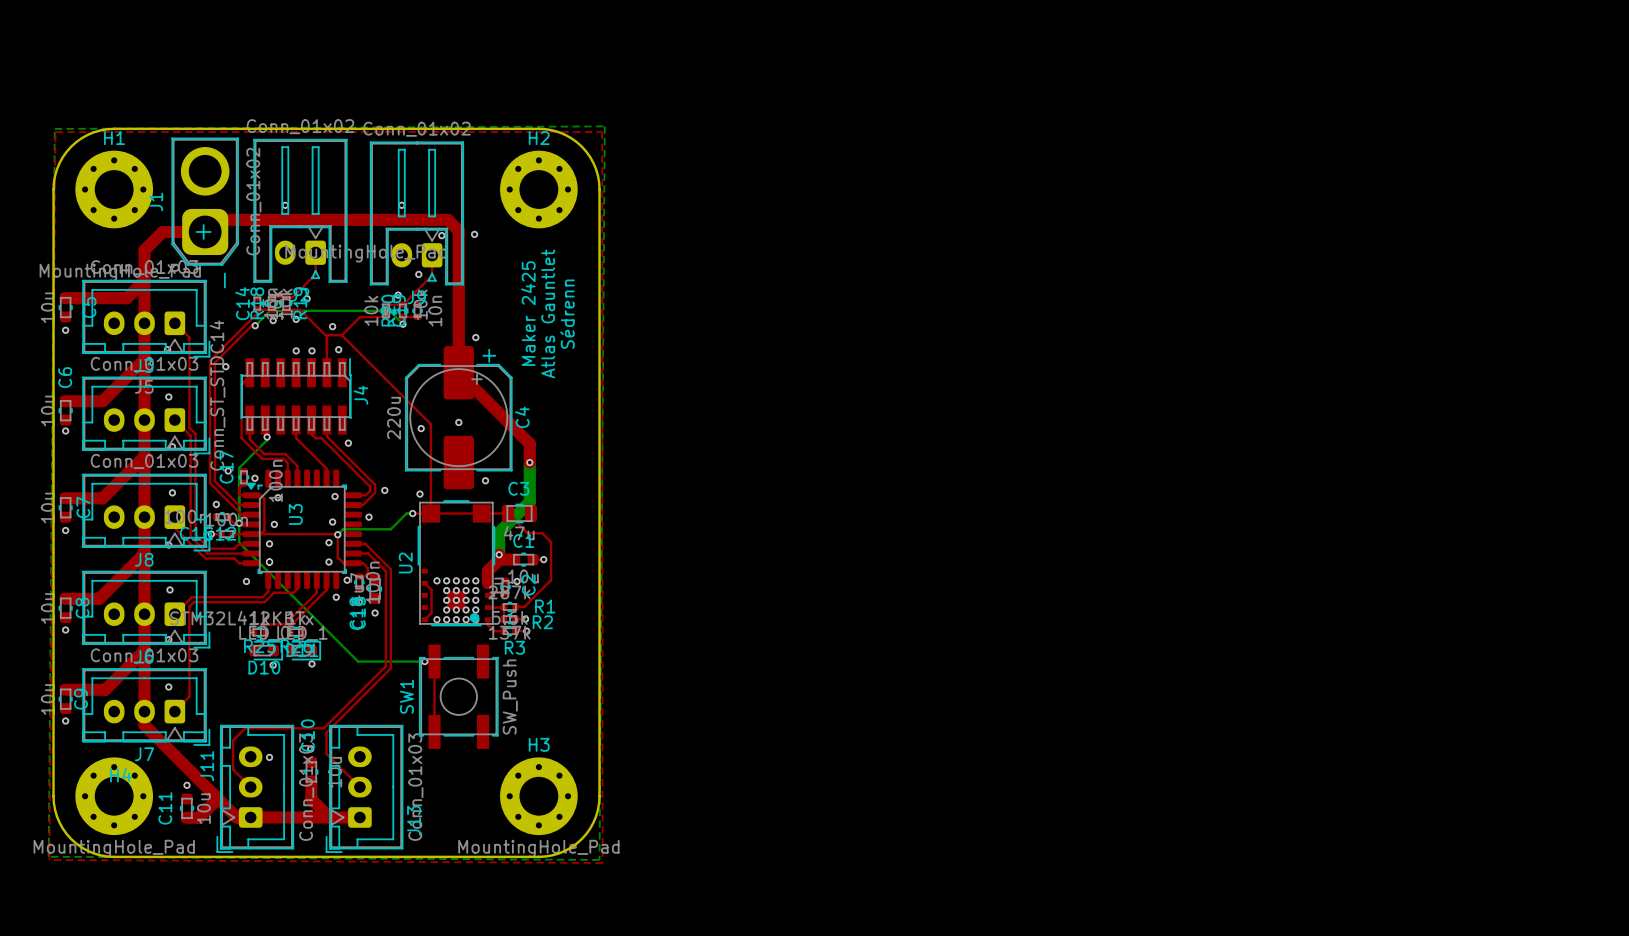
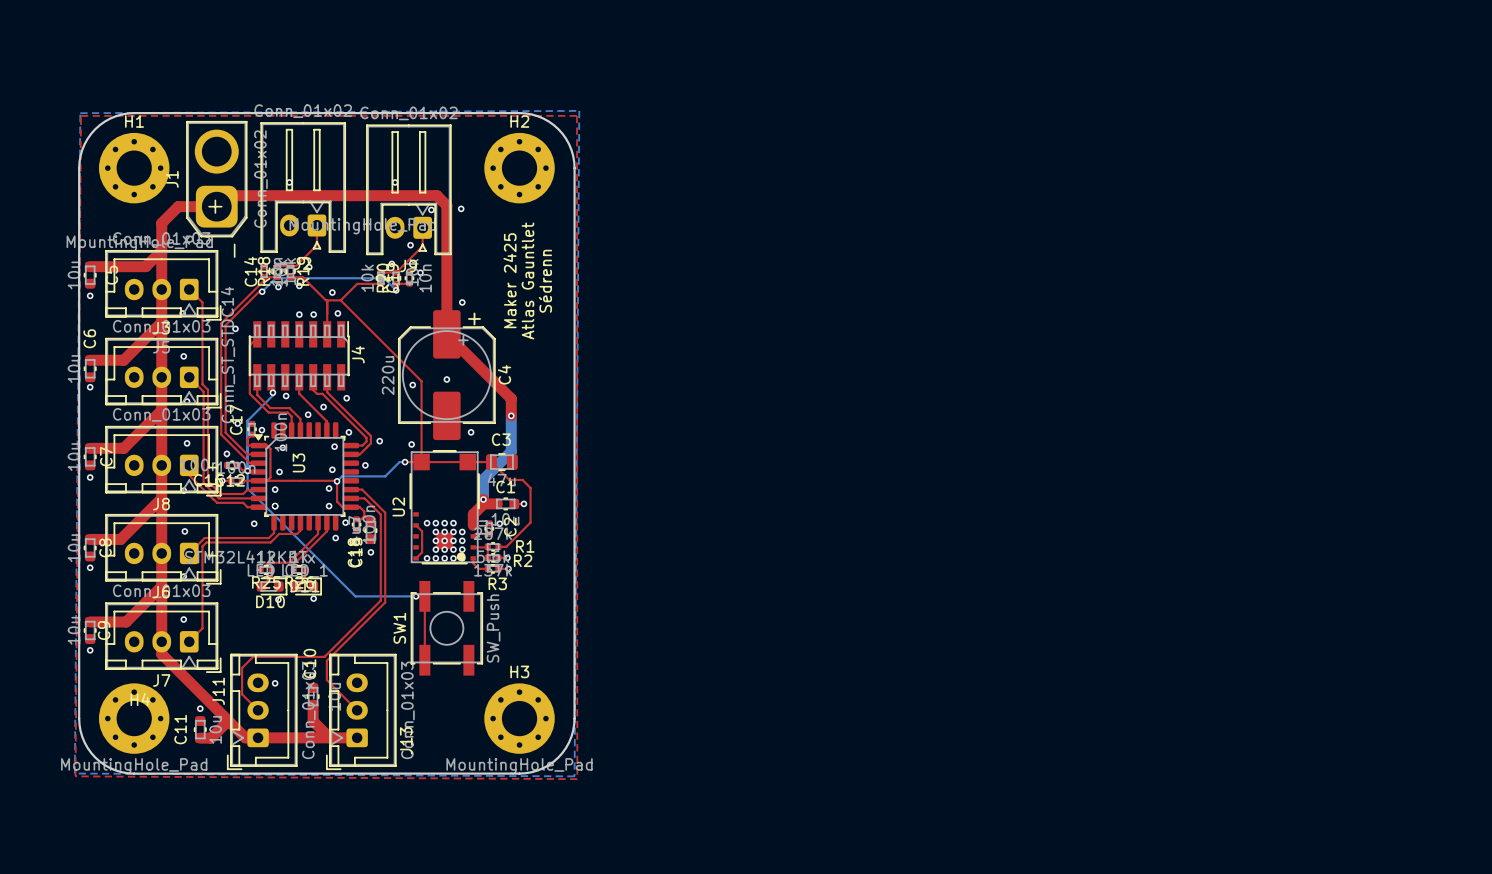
via: none -> (420, 272)
via: none -> (286, 396)
via: none -> (323, 407)
via: none -> (308, 414)
via: none -> (348, 432)
via: (475, 580) -> none

